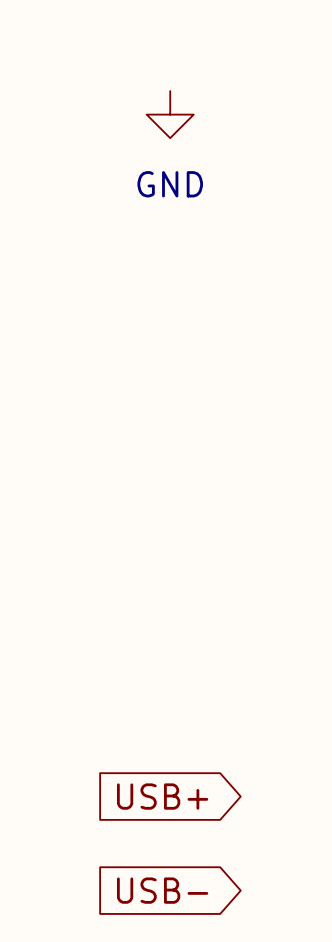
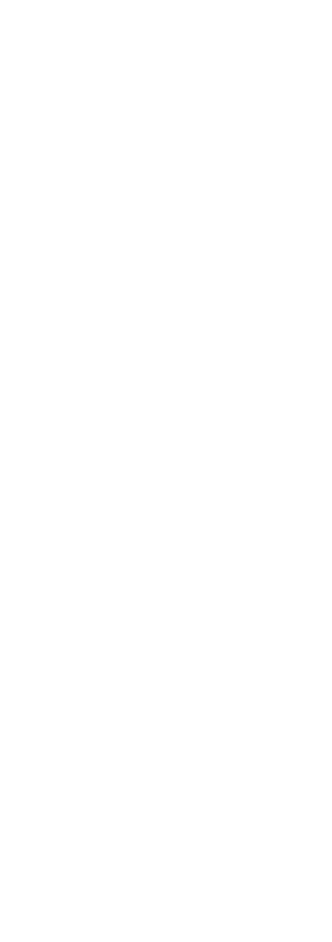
power symbol: GND (170, 114) -> none
global label: USB+ (162, 796) -> none
global label: USB- (162, 890) -> none

